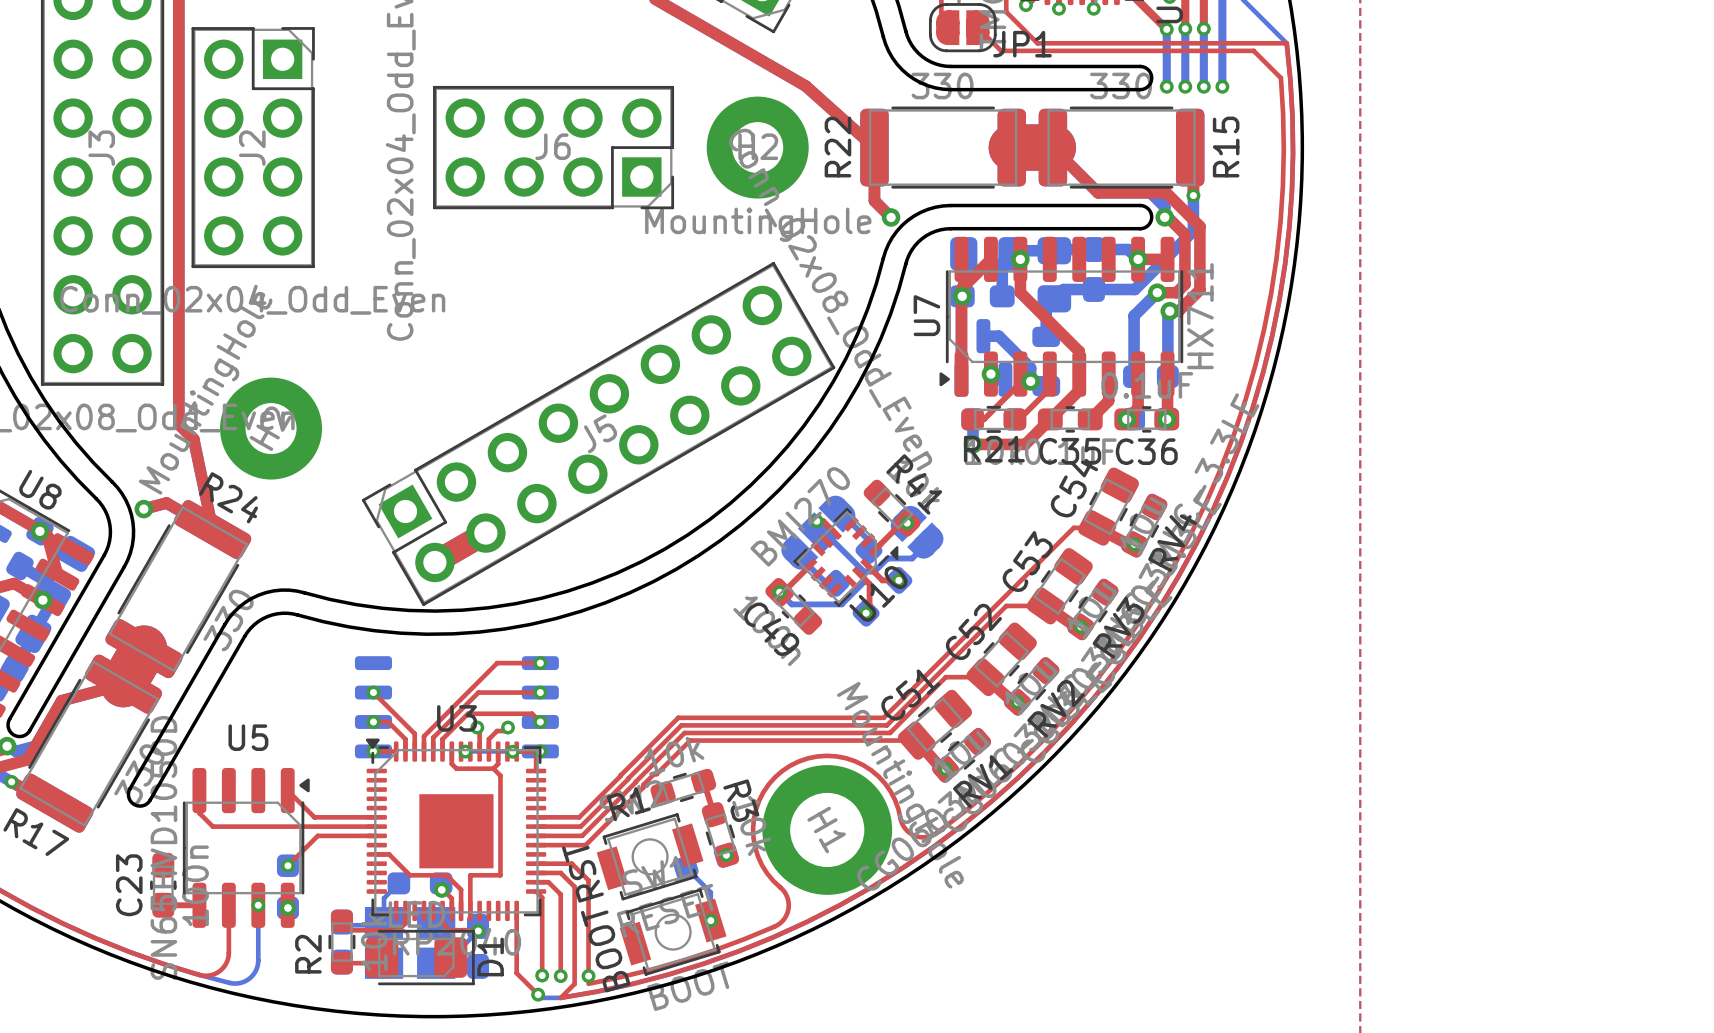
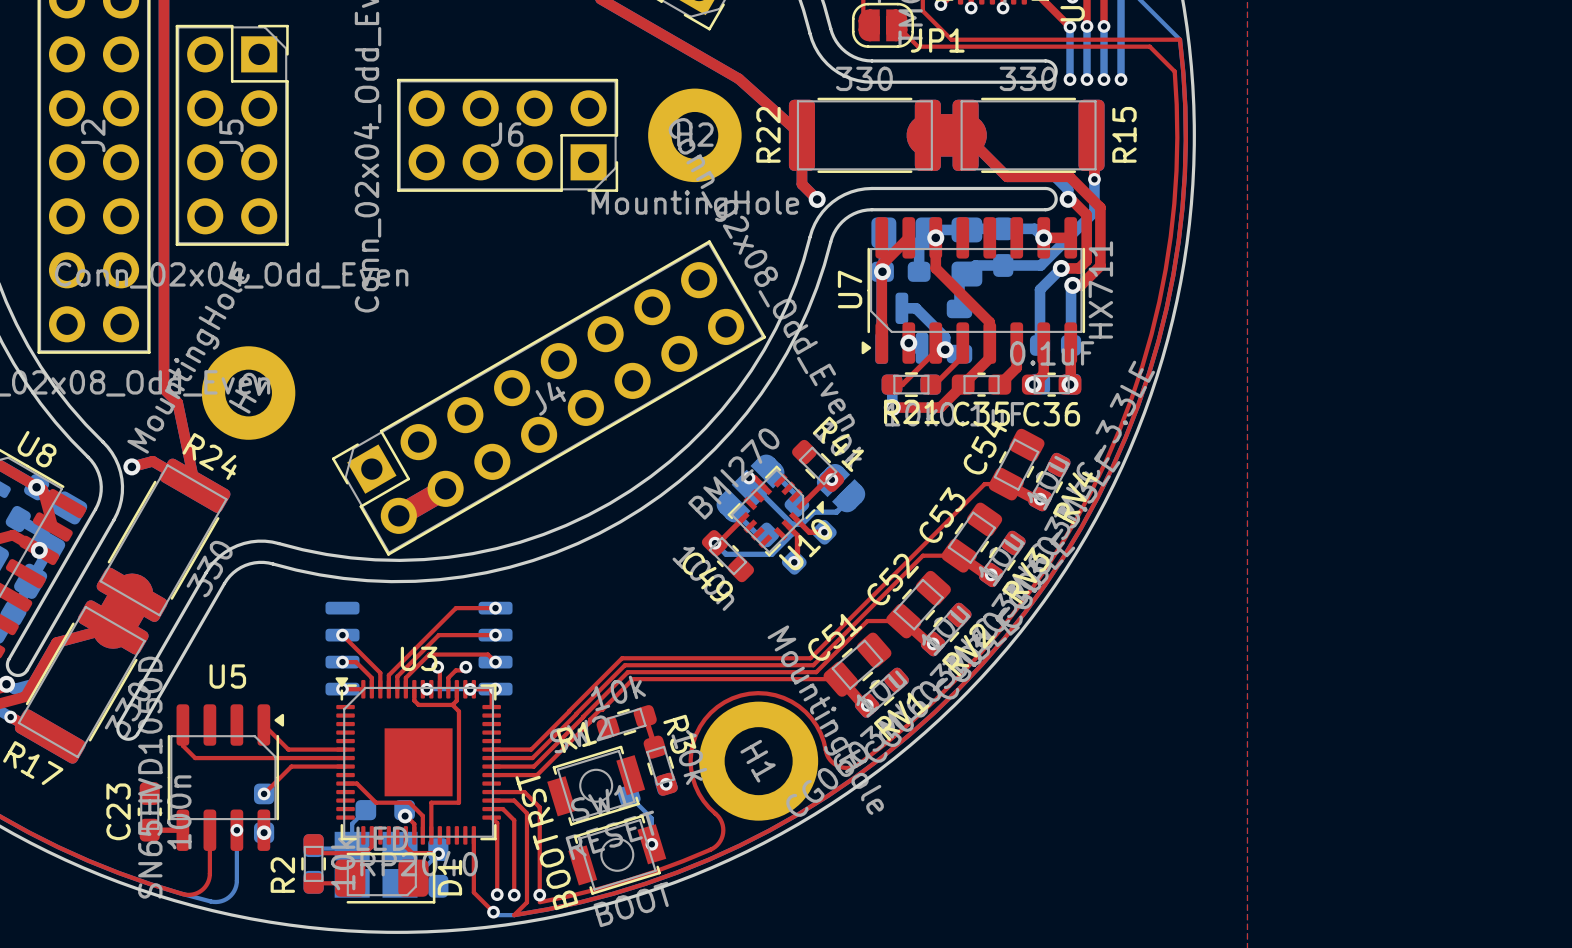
J3 name: J3 (101, 148) -> J2 (93, 135)
J2 name: J2 (252, 148) -> J5 (231, 135)
J5 name: J5 (600, 433) -> J4 (550, 398)

